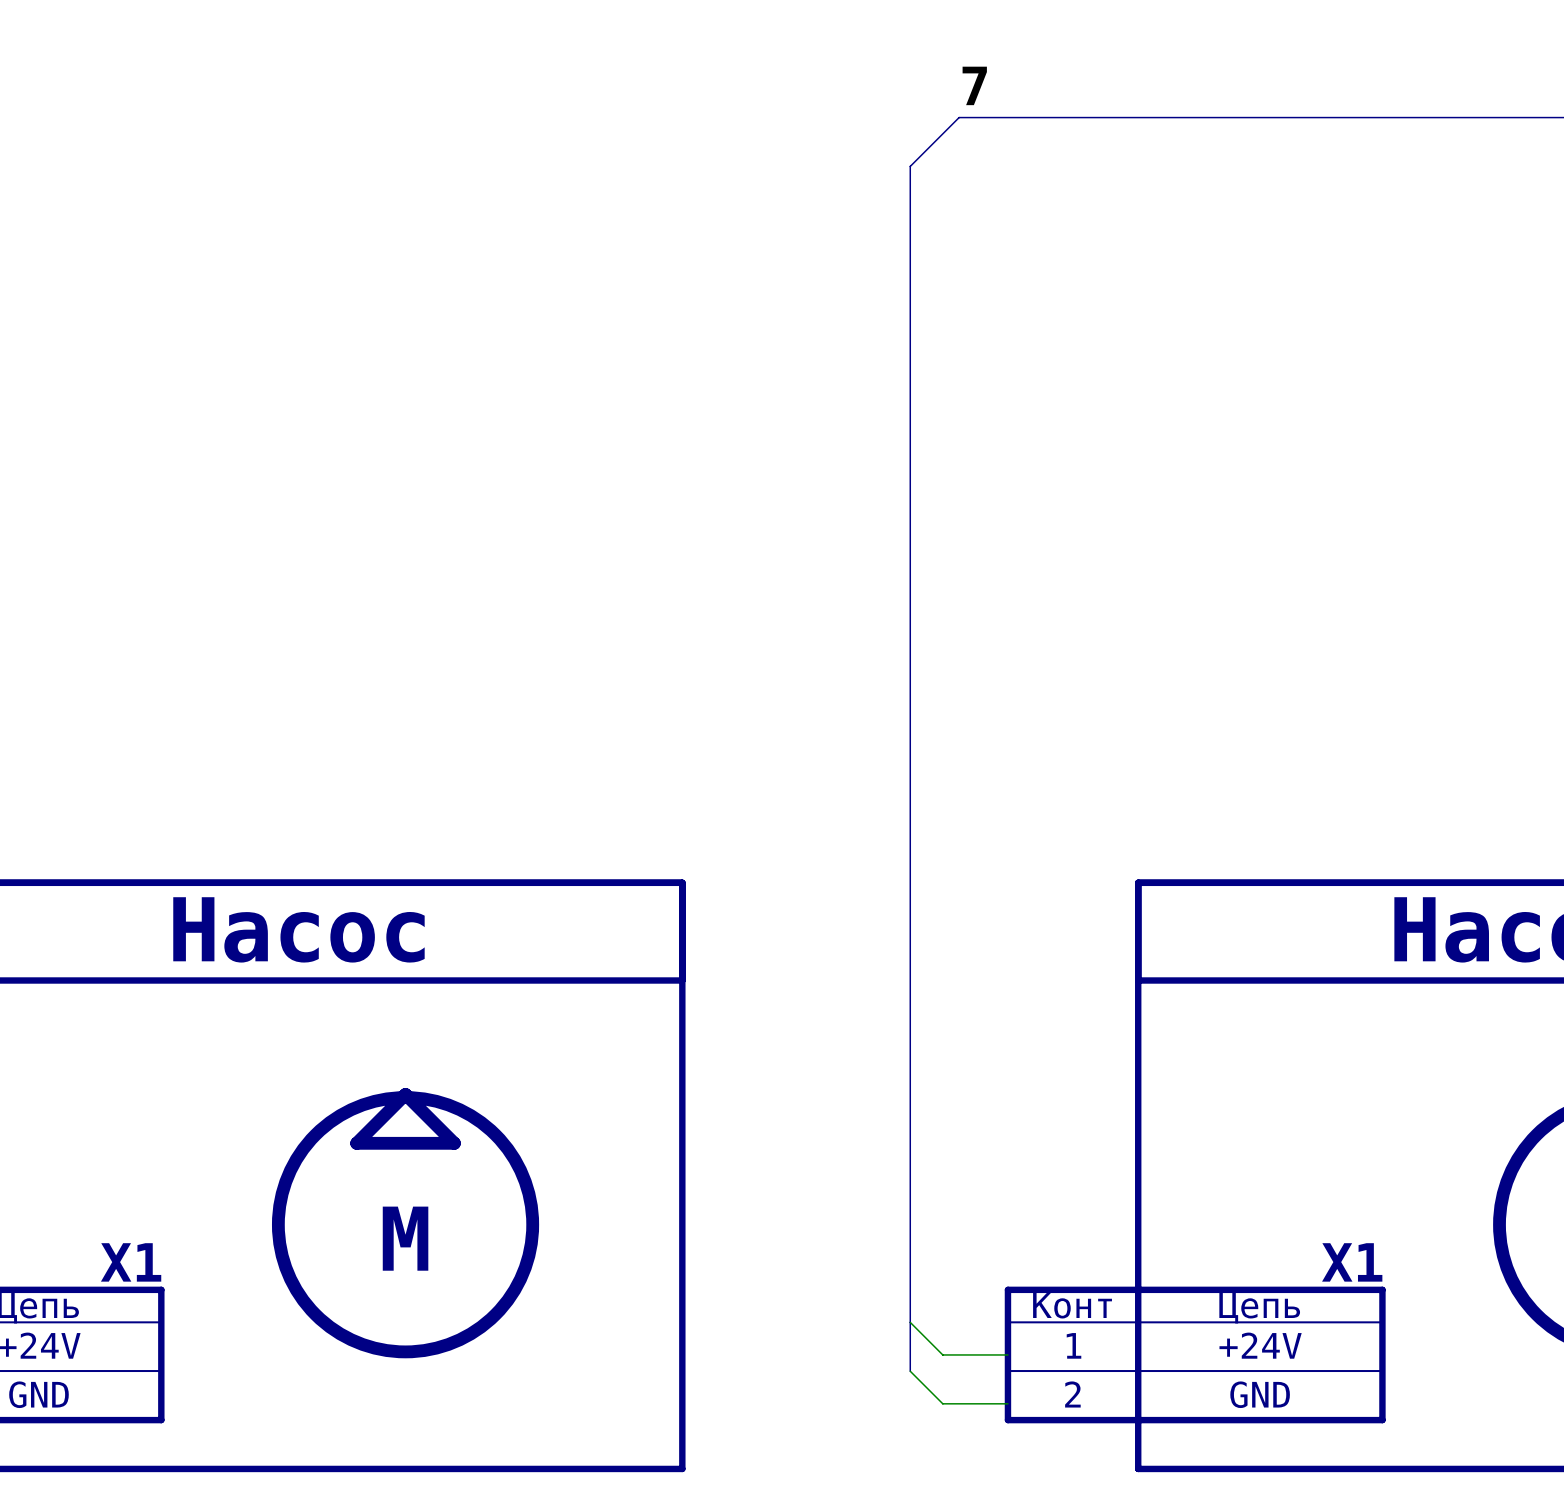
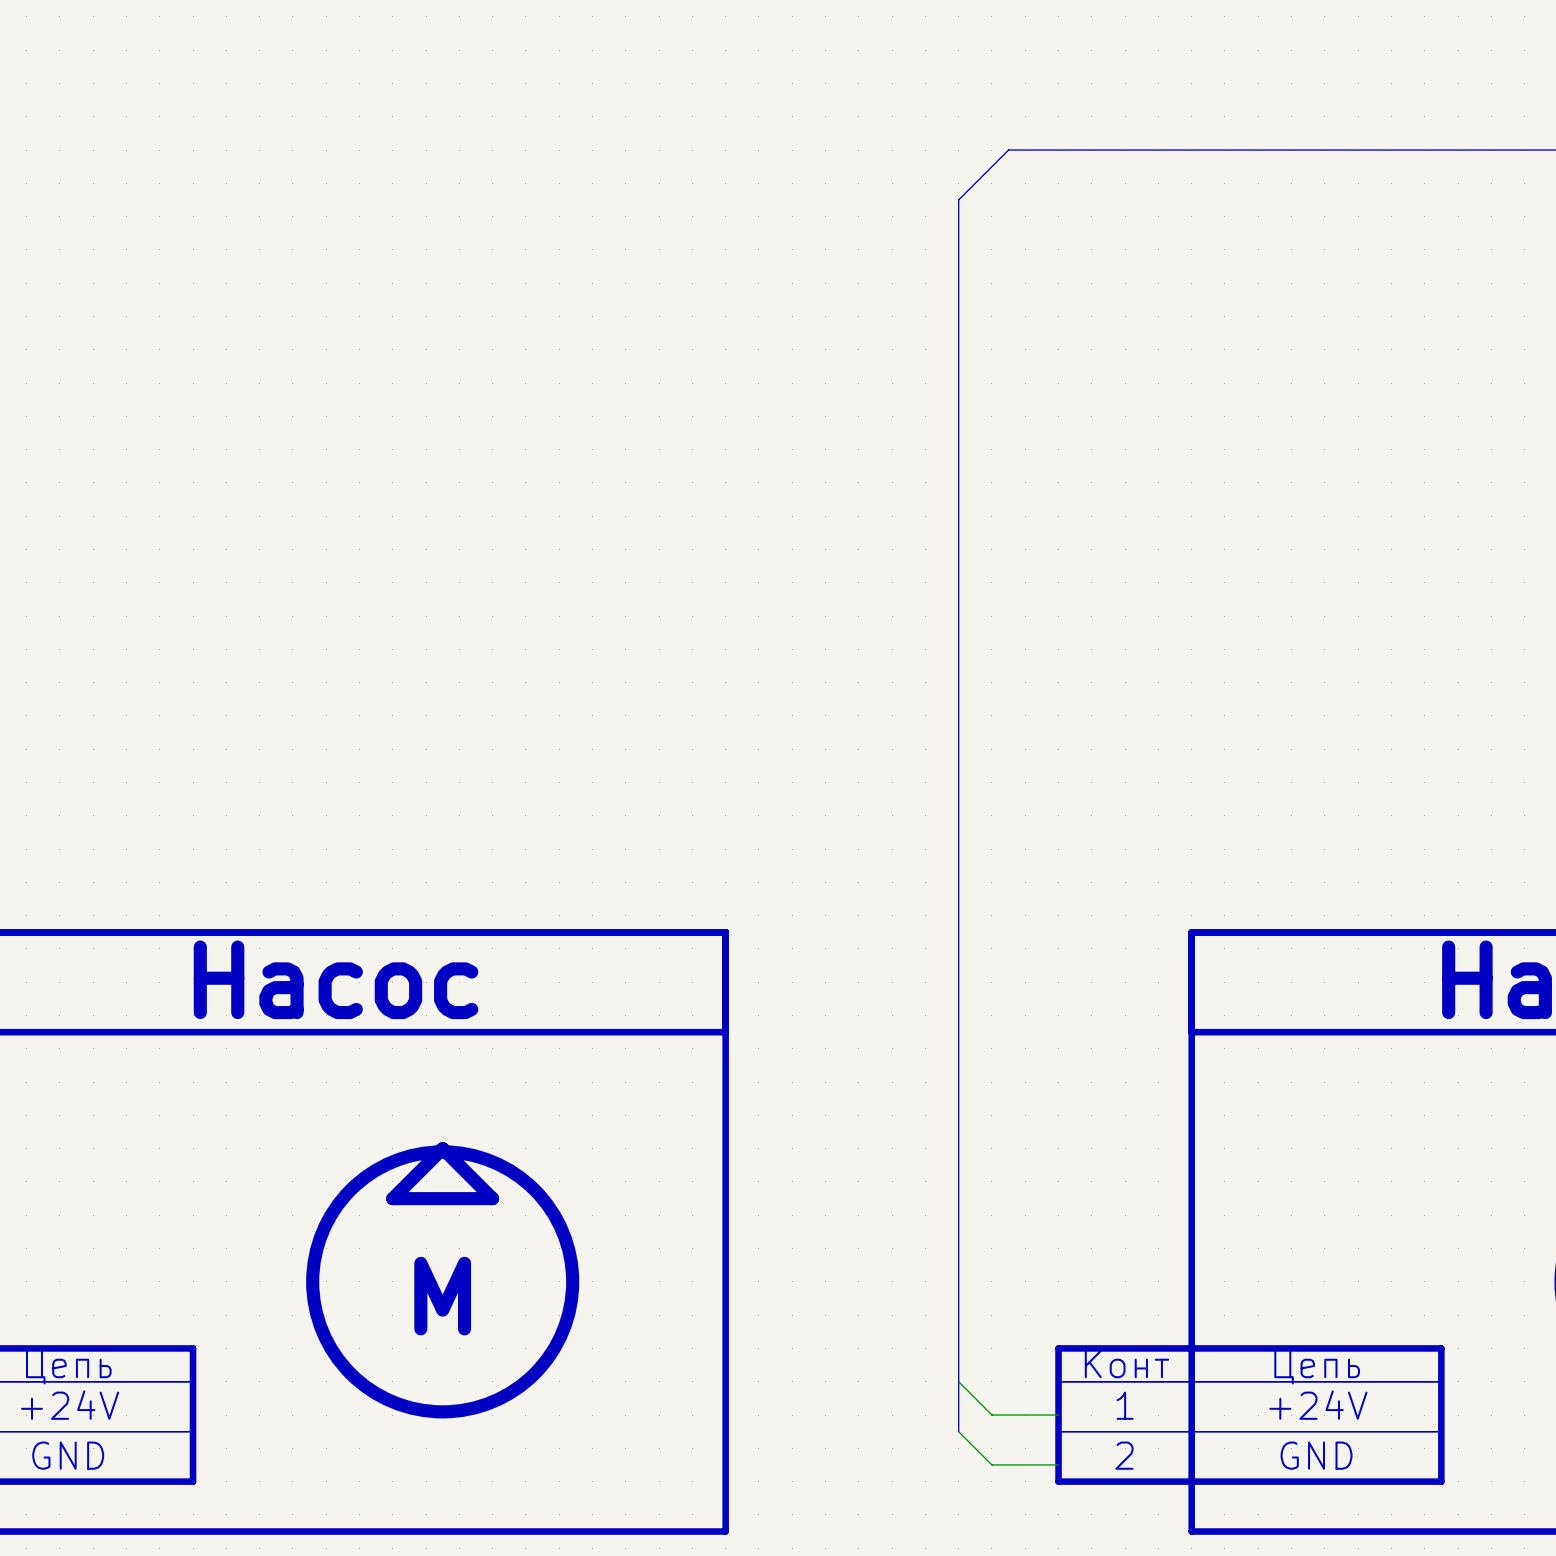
label: 7 (974, 85) -> none
text: X1 (131, 1262) -> none
text: X1 (1352, 1262) -> none

